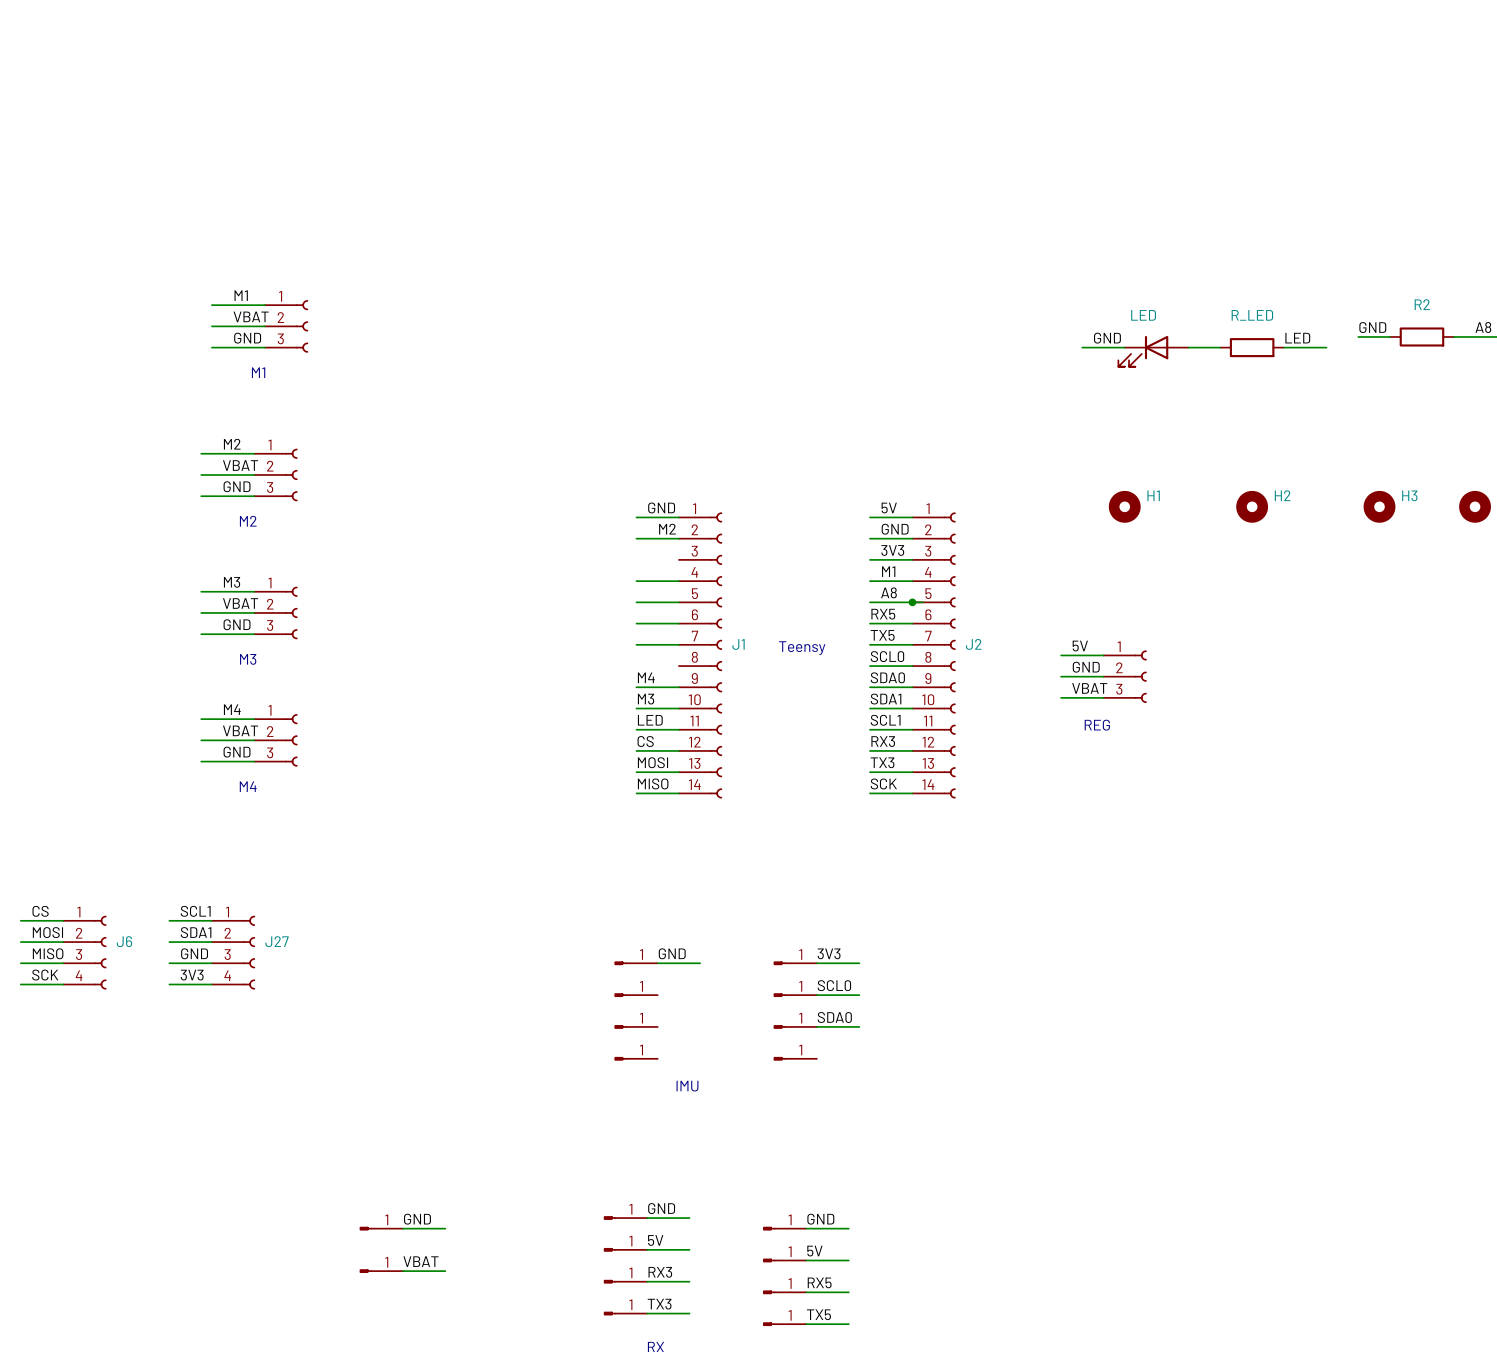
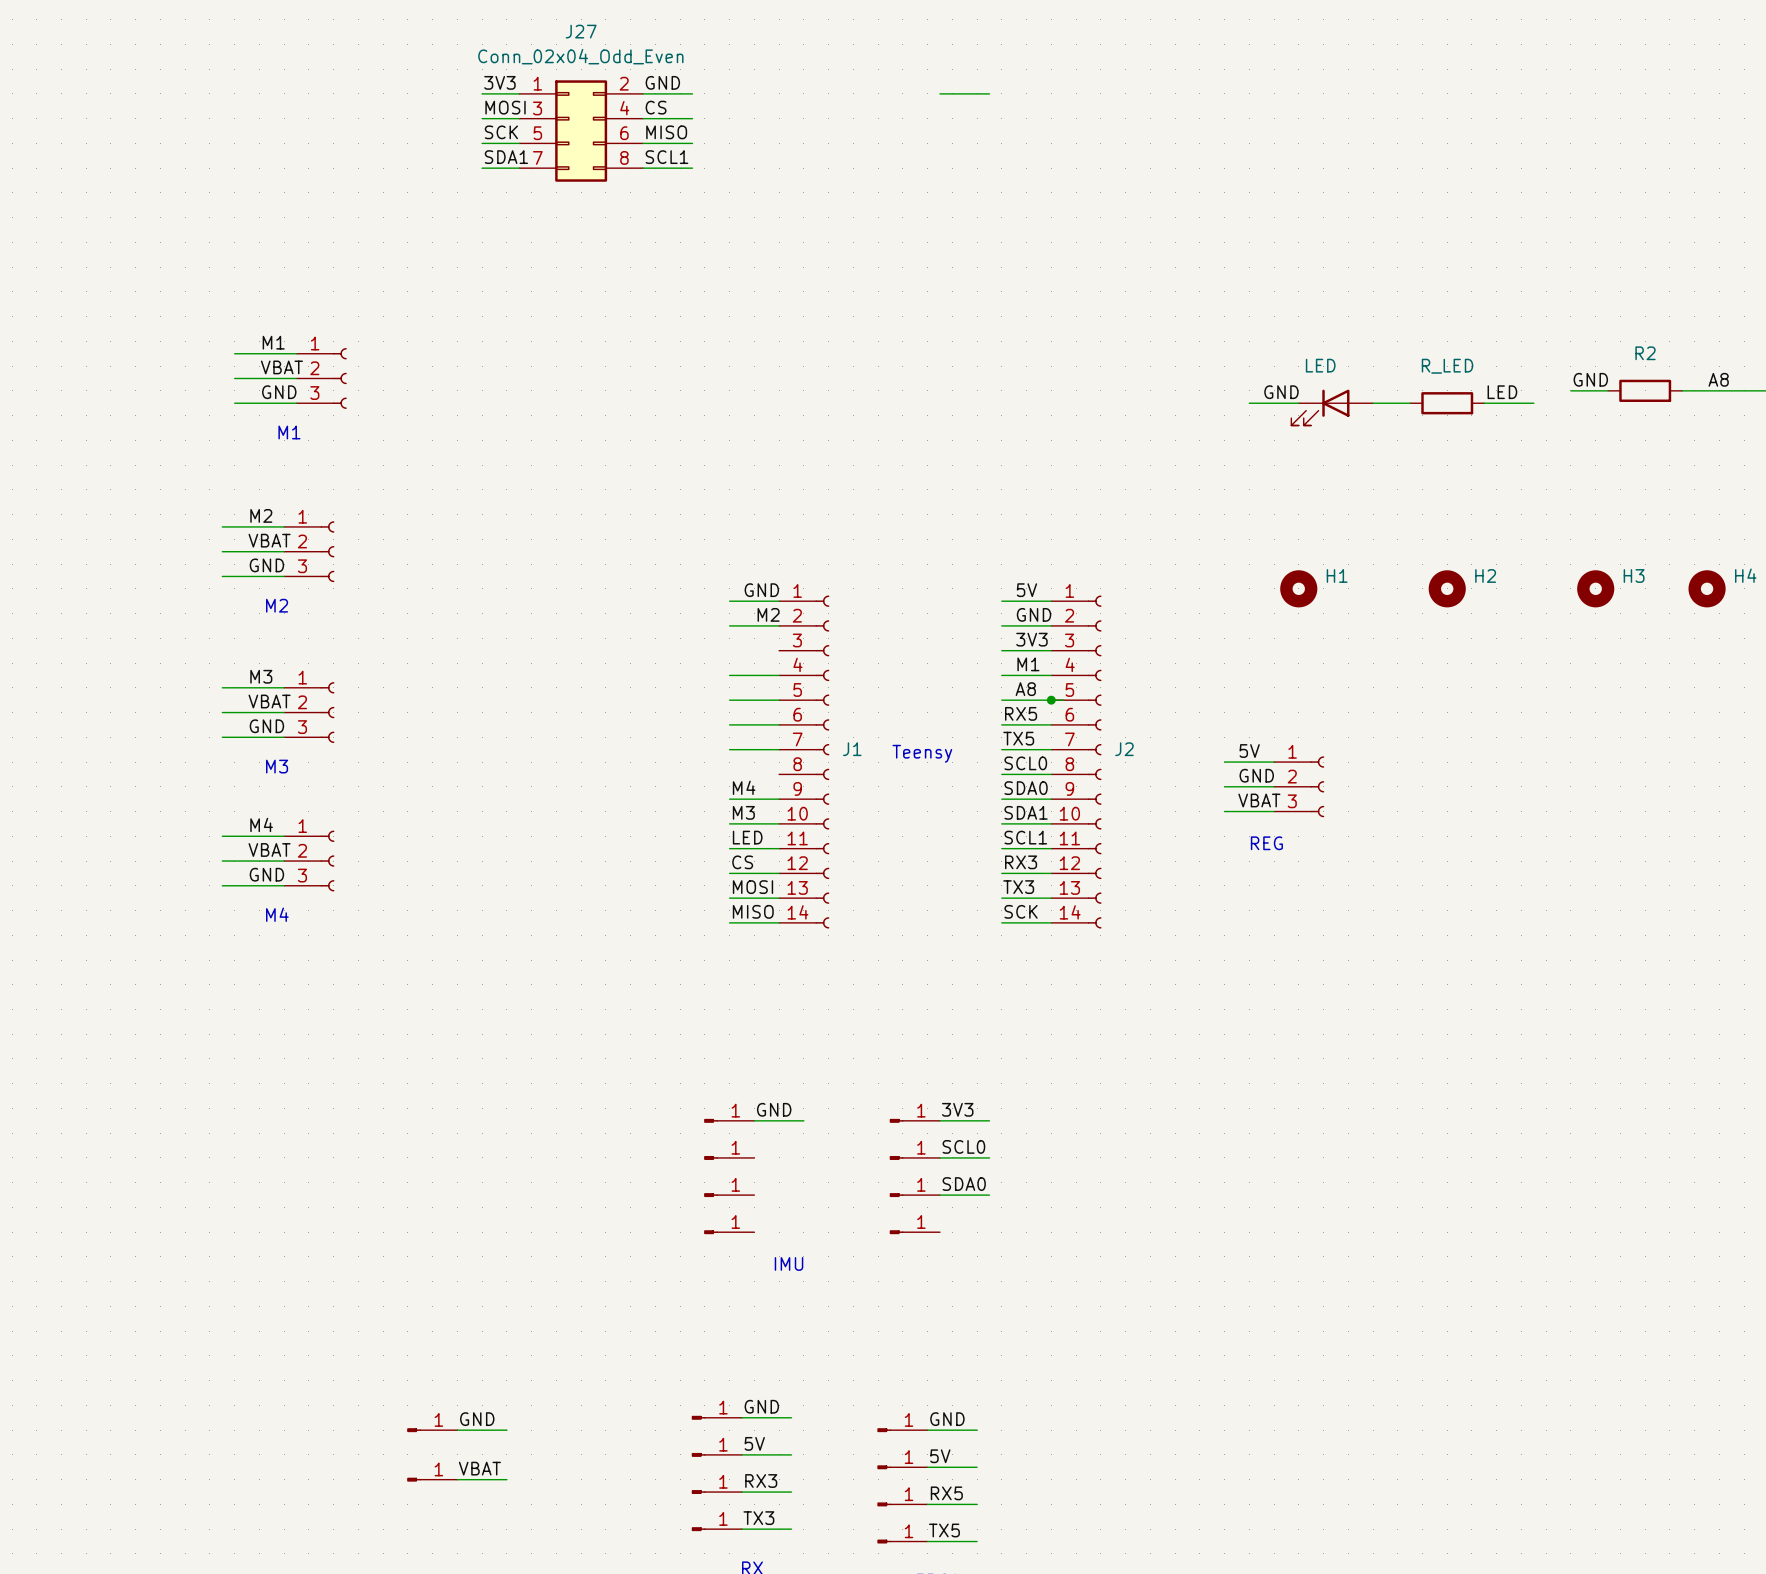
J27 value: none -> Conn_02x04_Odd_Even (580, 56)
label: none -> 3V3 (499, 82)
label: none -> GND (662, 82)
wire: none -> (482, 93) (519, 93)
wire: none -> (643, 93) (692, 93)
wire: none -> (939, 93) (989, 93)
label: none -> MOSI (505, 107)
label: none -> CS (656, 107)
wire: none -> (482, 118) (519, 118)
wire: none -> (643, 118) (692, 118)
label: none -> SCK (501, 132)
label: none -> MISO (666, 132)
wire: none -> (482, 143) (519, 143)
wire: none -> (643, 143) (692, 143)
label: none -> SDA1 (506, 157)
label: none -> SCL1 (666, 157)
wire: none -> (482, 168) (519, 168)
wire: none -> (643, 168) (692, 168)
label: CS (40, 911) -> none
label: SCL1 (195, 911) -> none
J27 symbol: [211, 915, 255, 990] -> [519, 80, 644, 182]
wire: (20, 920) (63, 920) -> none
wire: (169, 920) (211, 920) -> none
label: MOSI (47, 932) -> none
label: SDA1 (196, 932) -> none
J27 name position: J27 (277, 941) -> J27 (581, 31)
wire: (20, 942) (63, 942) -> none
wire: (169, 942) (211, 942) -> none
J6: (84, 952) -> none
label: MISO (48, 953) -> none
label: GND (194, 953) -> none
wire: (20, 963) (63, 963) -> none
wire: (169, 963) (211, 963) -> none
label: SCK (45, 975) -> none
label: 3V3 (192, 975) -> none
wire: (20, 984) (63, 984) -> none
wire: (169, 984) (211, 984) -> none

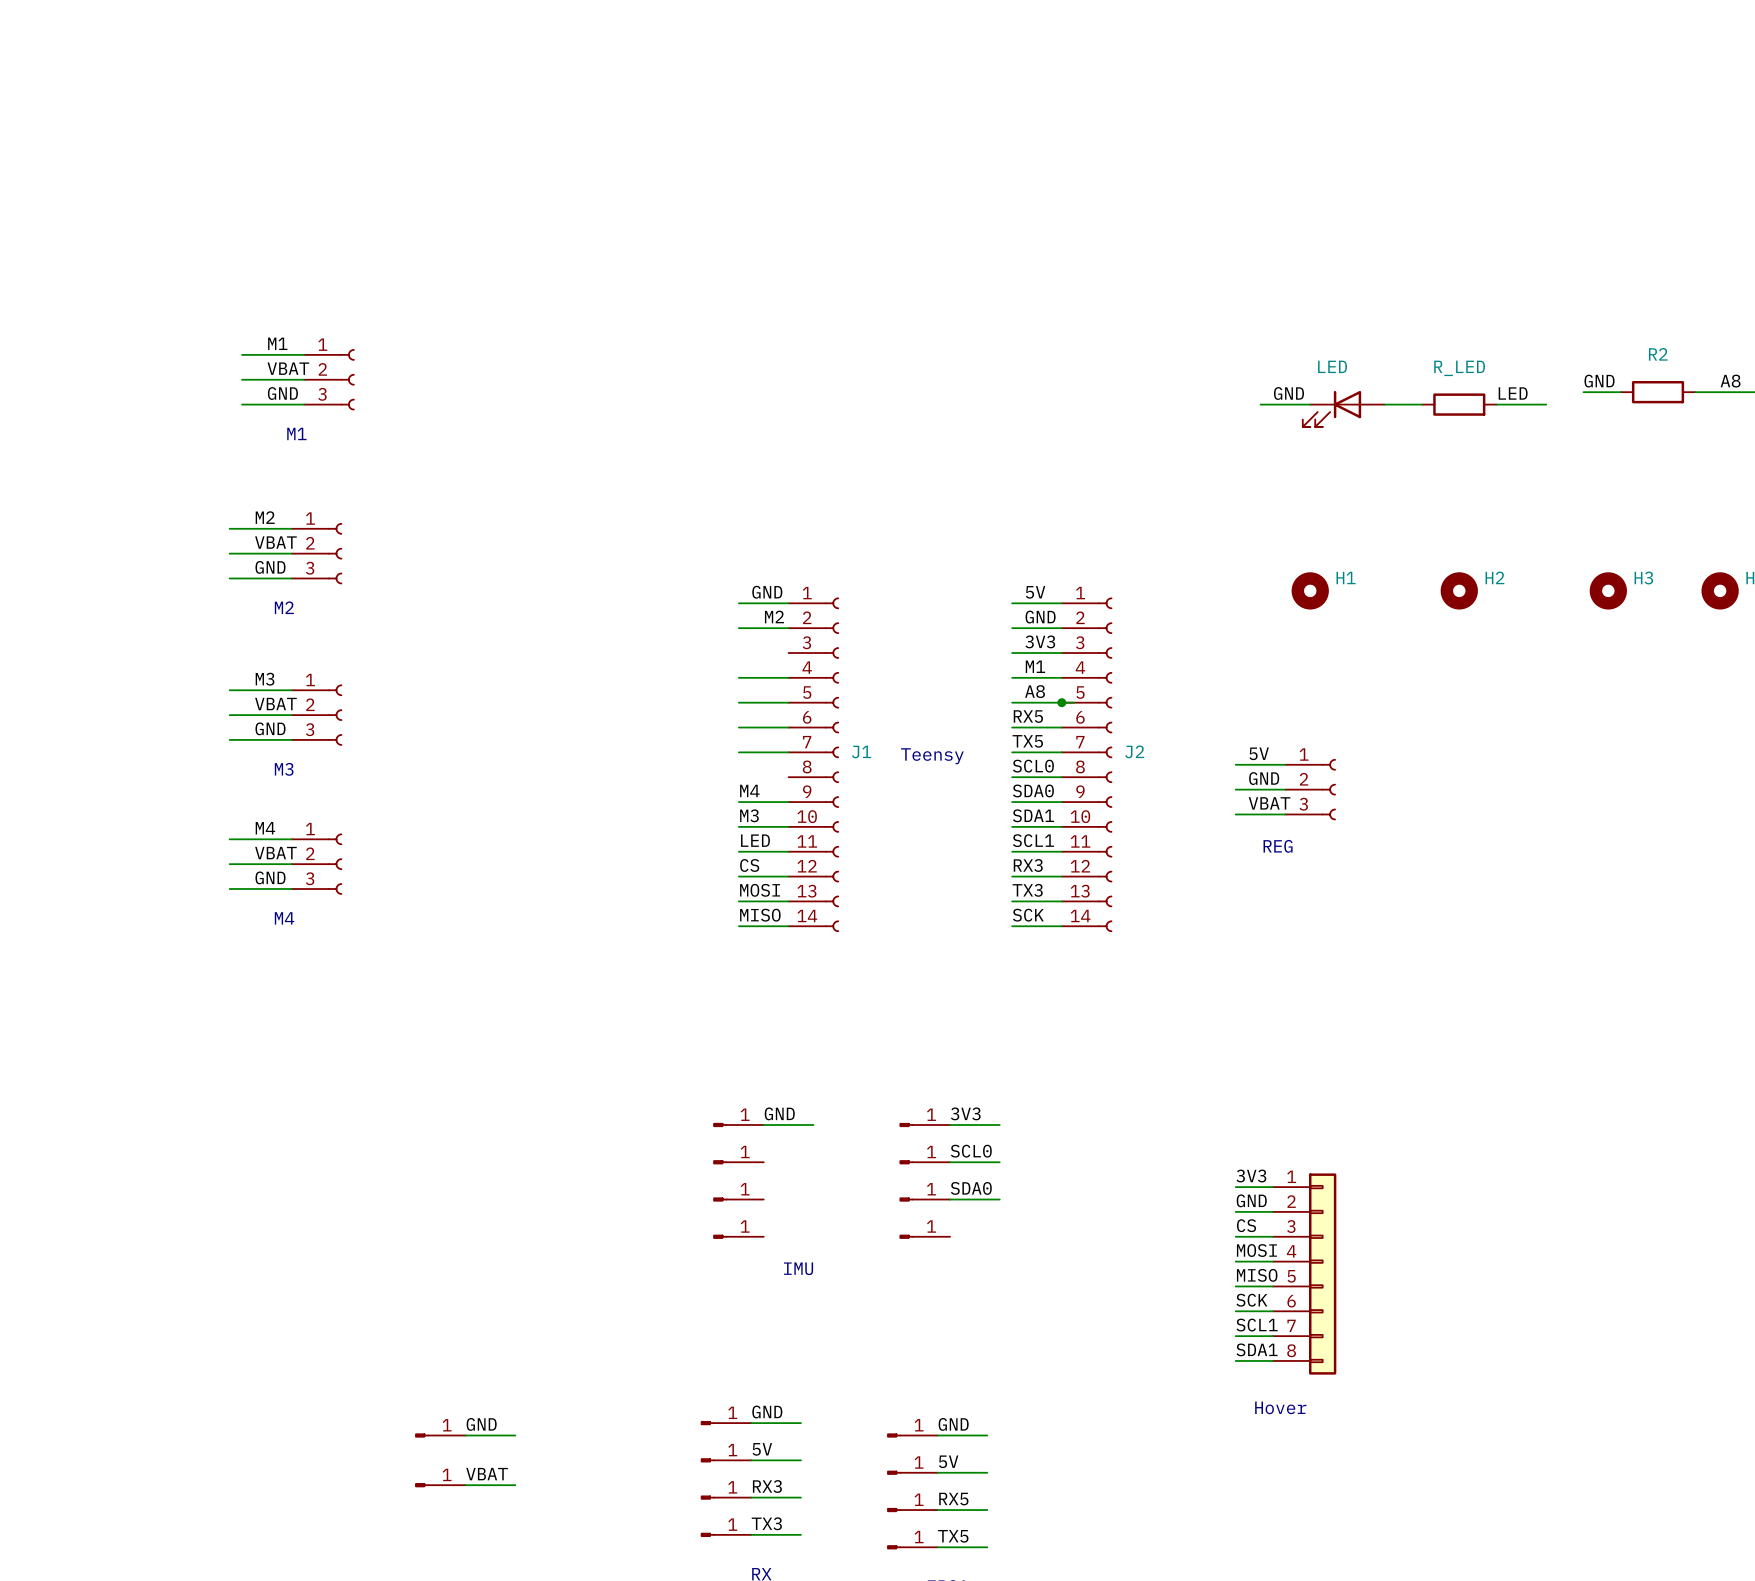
label: 3V3 (499, 82) -> none
label: GND (662, 82) -> none
wire: (482, 93) (519, 93) -> none
wire: (643, 93) (692, 93) -> none
wire: (939, 93) (989, 93) -> none
label: MOSI (505, 107) -> none
label: CS (656, 107) -> none
wire: (482, 118) (519, 118) -> none
wire: (643, 118) (692, 118) -> none
J27: Conn_02x04_Odd_Even (581, 131) -> none
label: SCK (501, 132) -> none
label: MISO (666, 132) -> none
wire: (482, 143) (519, 143) -> none
wire: (643, 143) (692, 143) -> none
label: SDA1 (506, 157) -> none
label: SCL1 (666, 157) -> none
wire: (482, 168) (519, 168) -> none
wire: (643, 168) (692, 168) -> none
label: none -> 3V3 (1251, 1176)
wire: none -> (1235, 1187) (1272, 1187)
label: none -> GND (1251, 1200)
wire: none -> (1235, 1211) (1272, 1211)
label: none -> CS (1246, 1225)
wire: none -> (1235, 1236) (1272, 1236)
label: none -> MOSI (1256, 1250)
wire: none -> (1235, 1261) (1272, 1261)
part: none -> (1304, 1274)
label: none -> MISO (1257, 1275)
wire: none -> (1235, 1286) (1272, 1286)
label: none -> SCK (1251, 1300)
wire: none -> (1235, 1311) (1272, 1311)
label: none -> SCL1 (1257, 1325)
wire: none -> (1235, 1336) (1272, 1336)
label: none -> SDA1 (1257, 1349)
wire: none -> (1235, 1360) (1272, 1360)
text: none -> Hover (1280, 1407)

